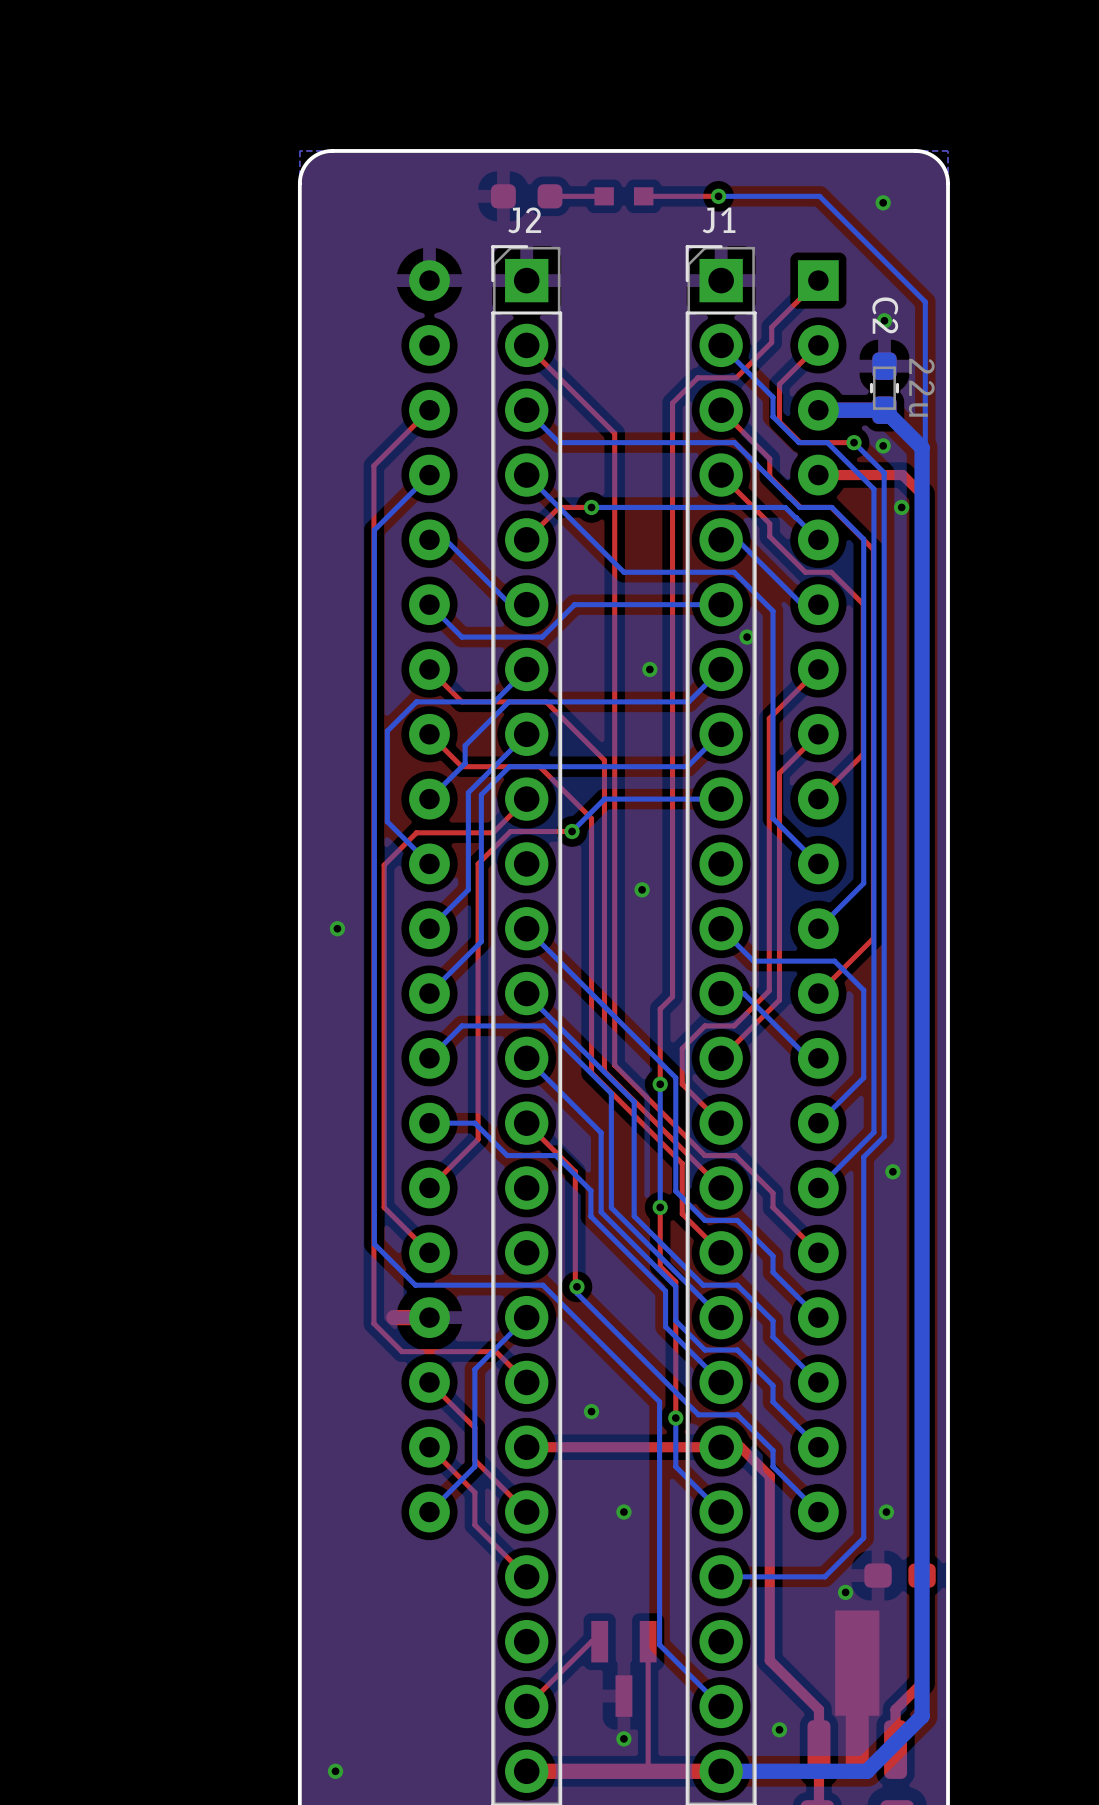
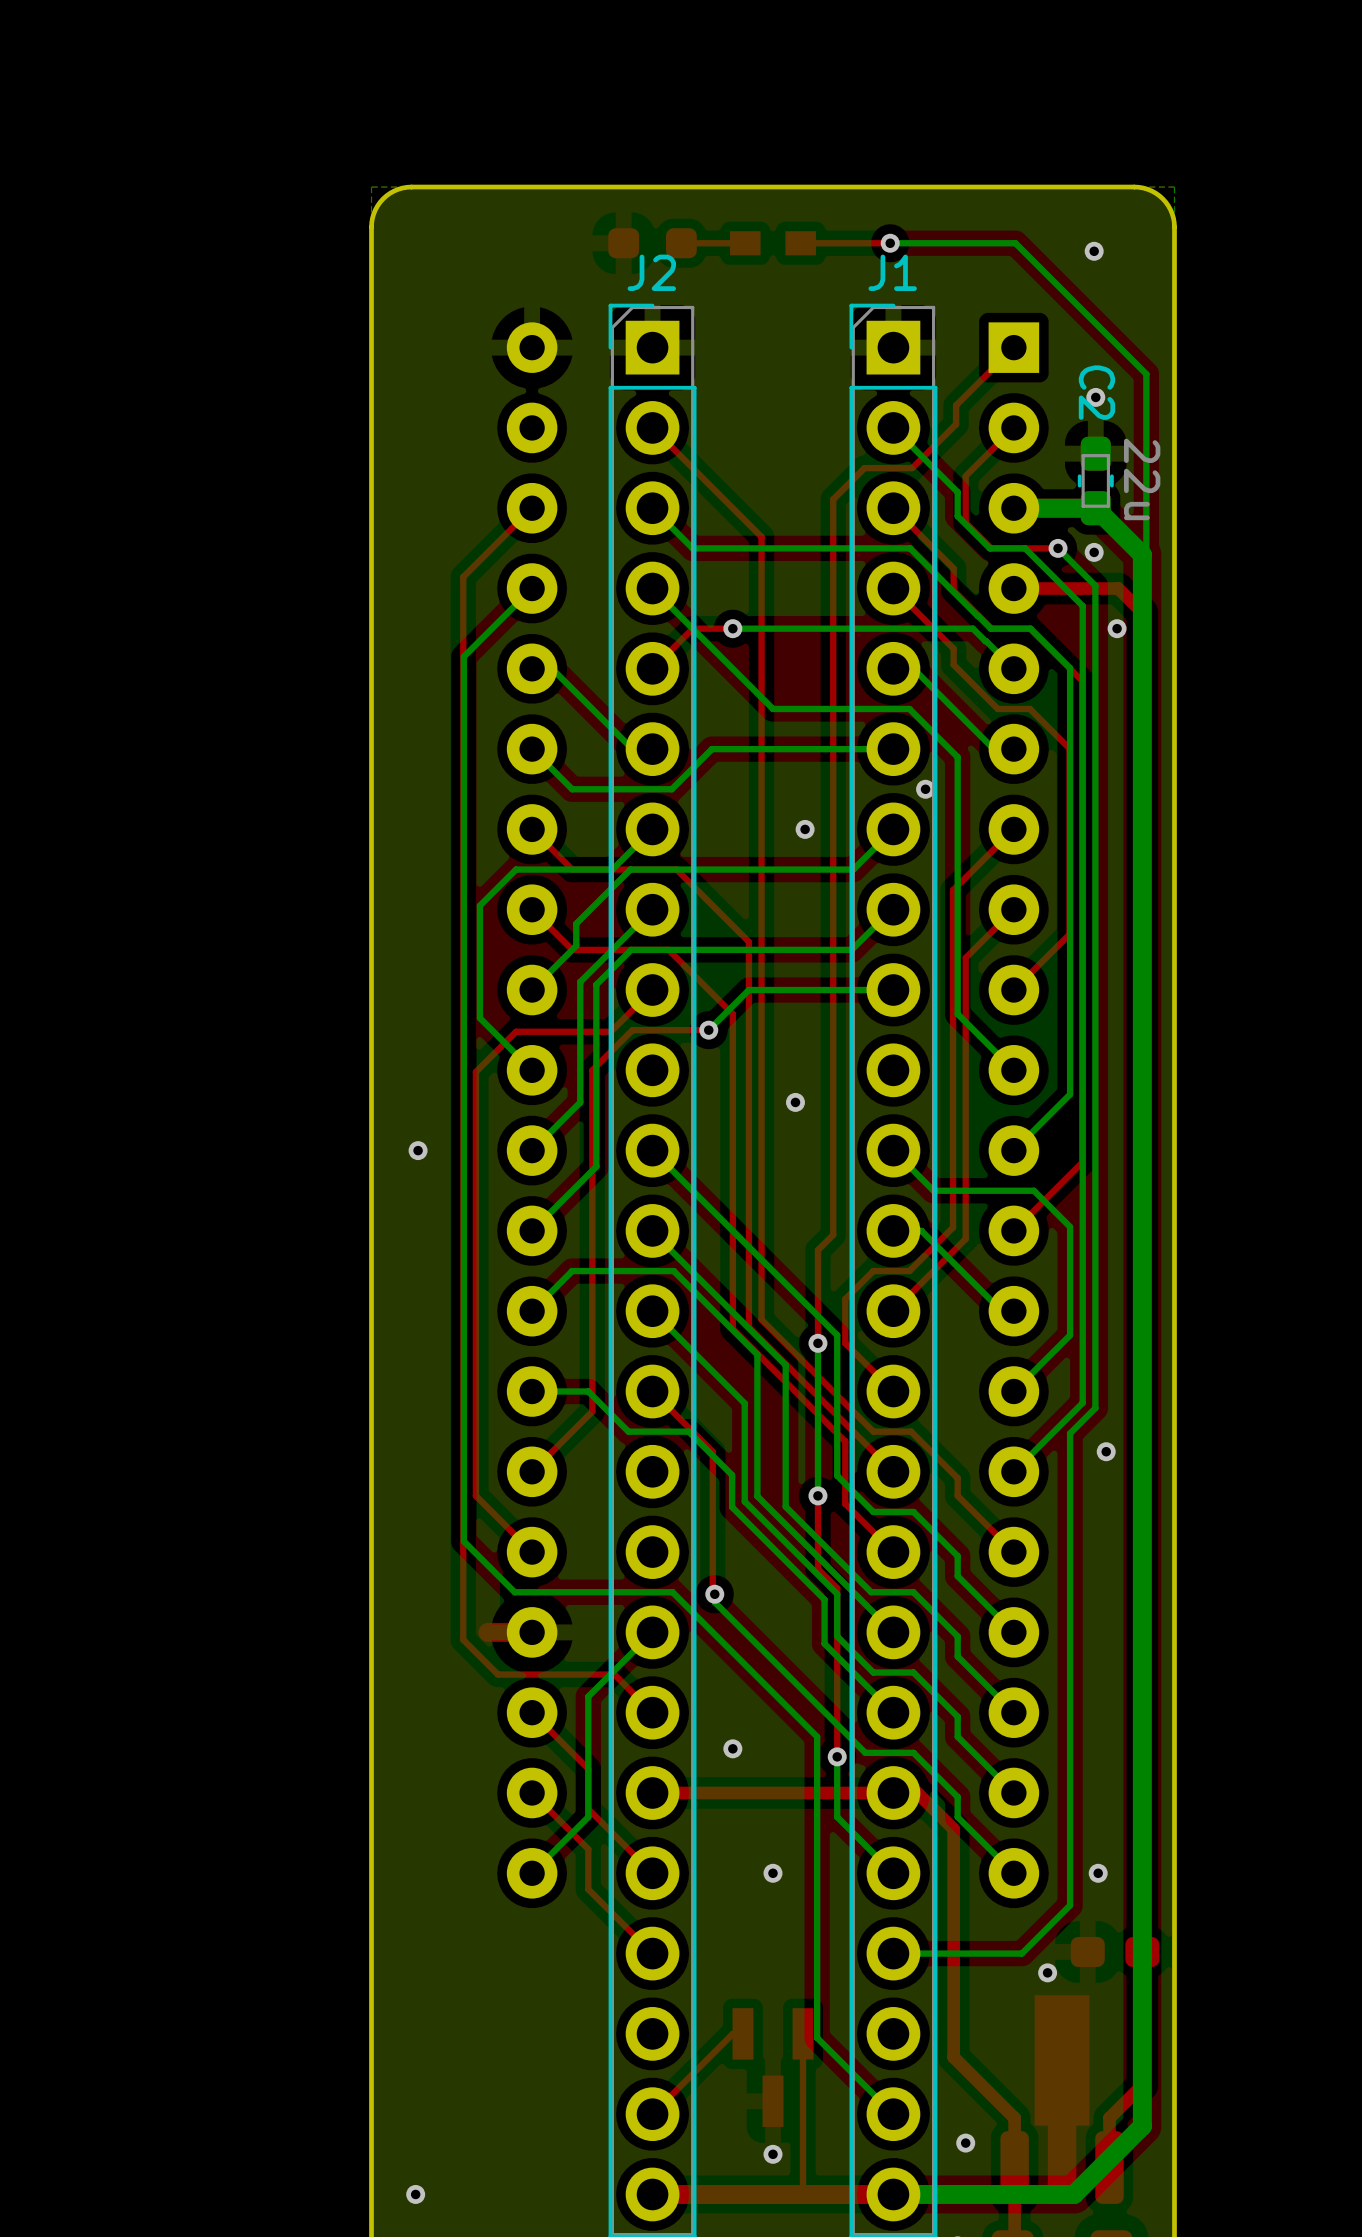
part footprint: [594, 187, 654, 206] -> [730, 231, 816, 256]

